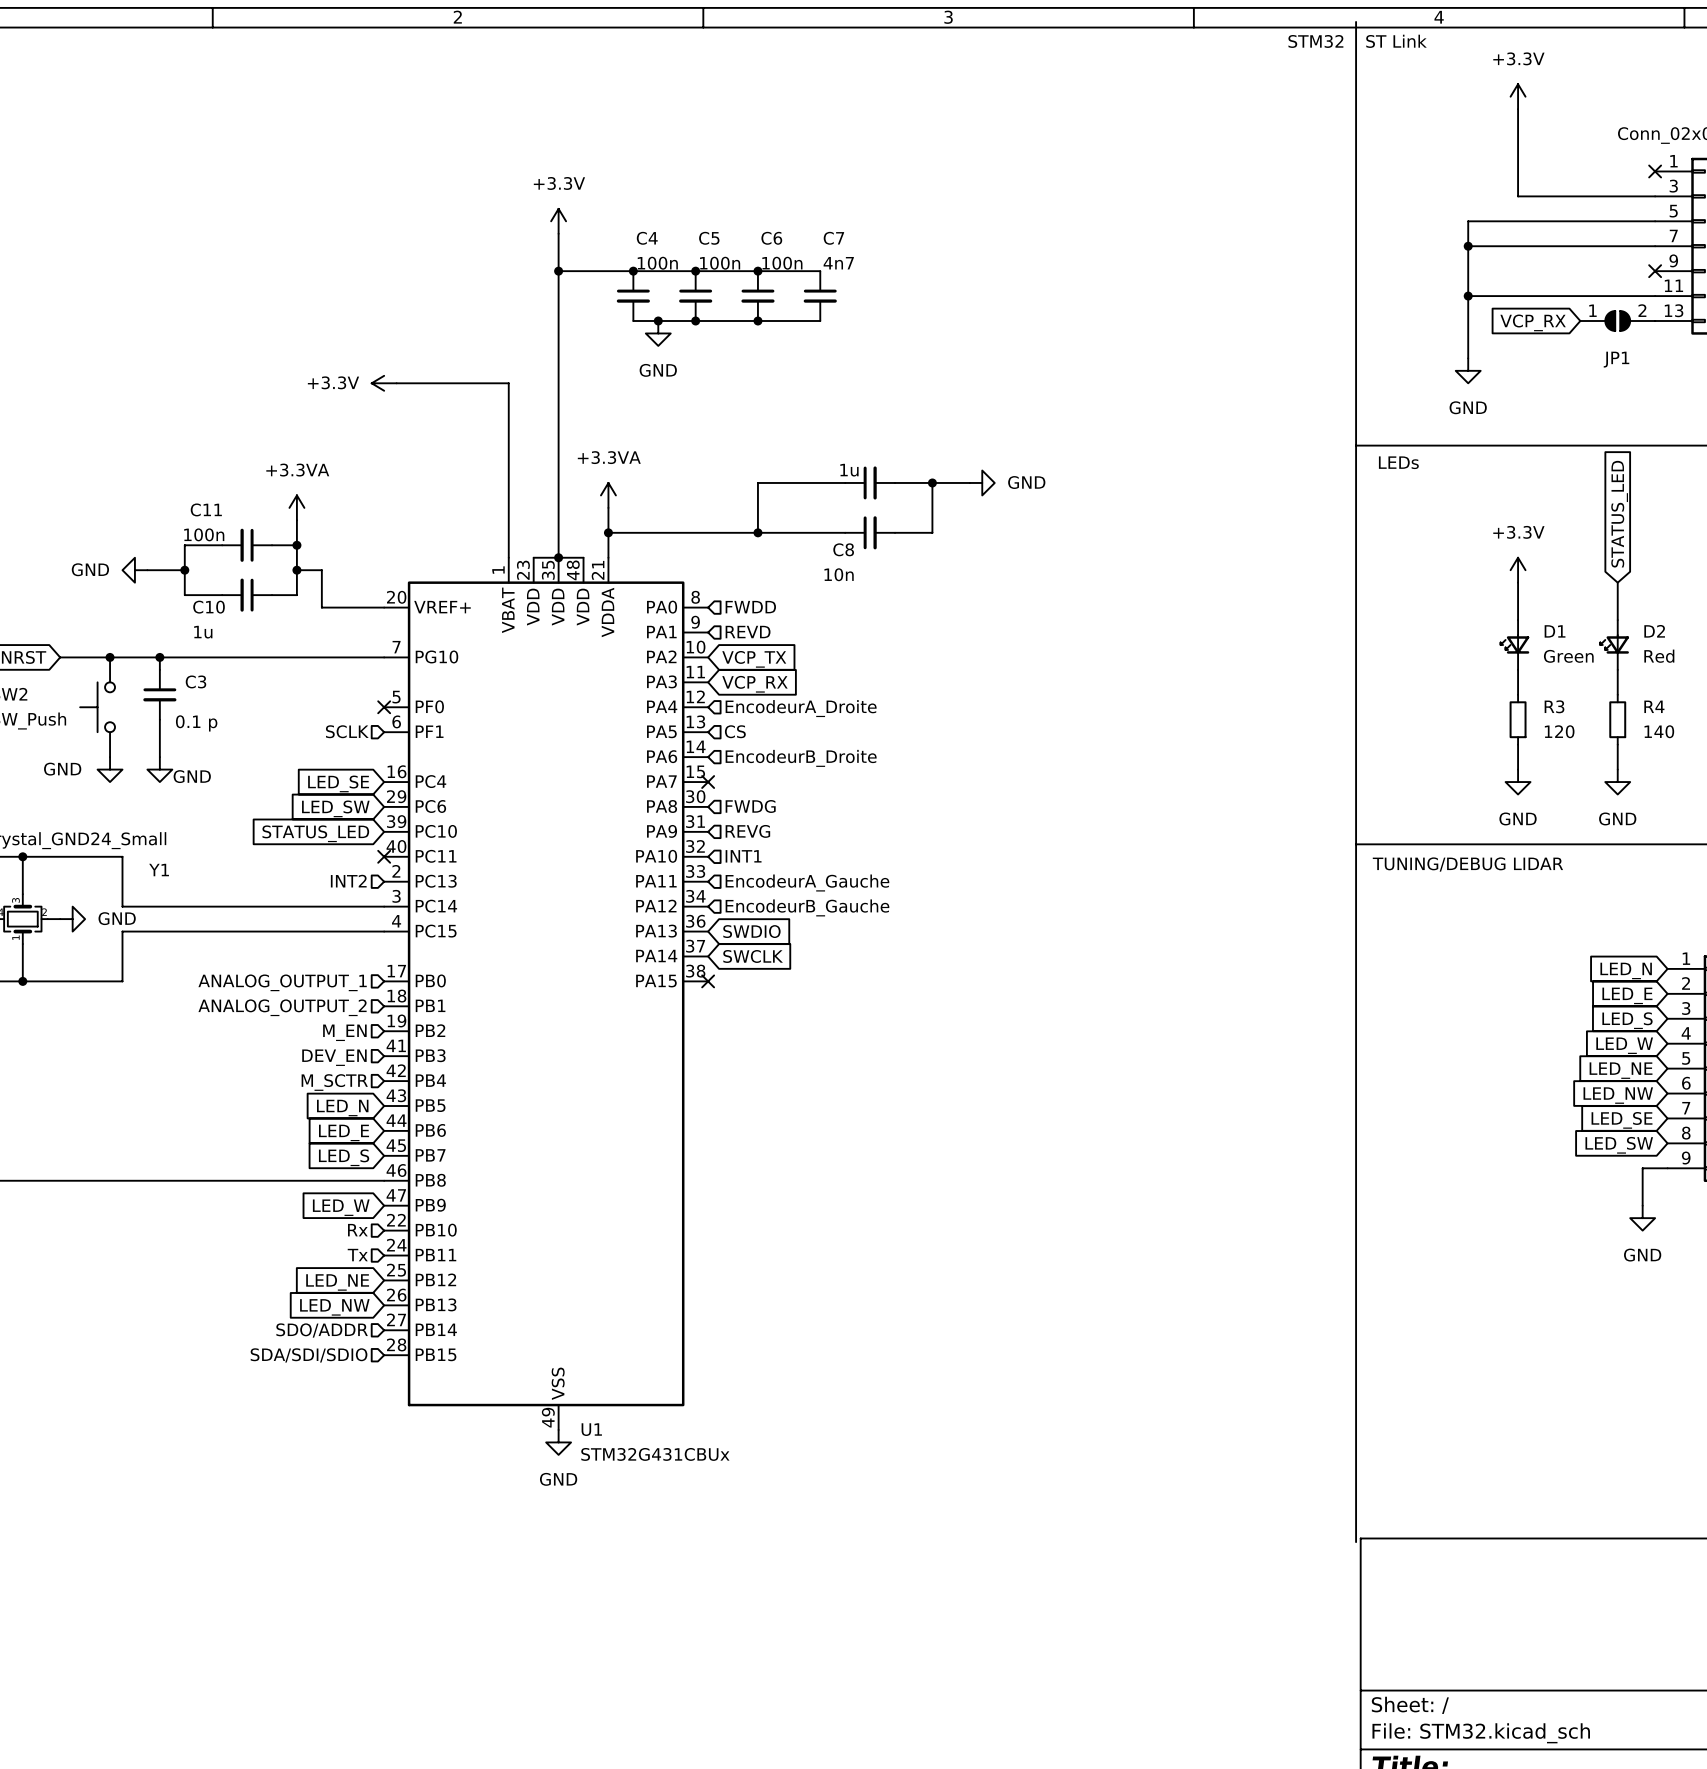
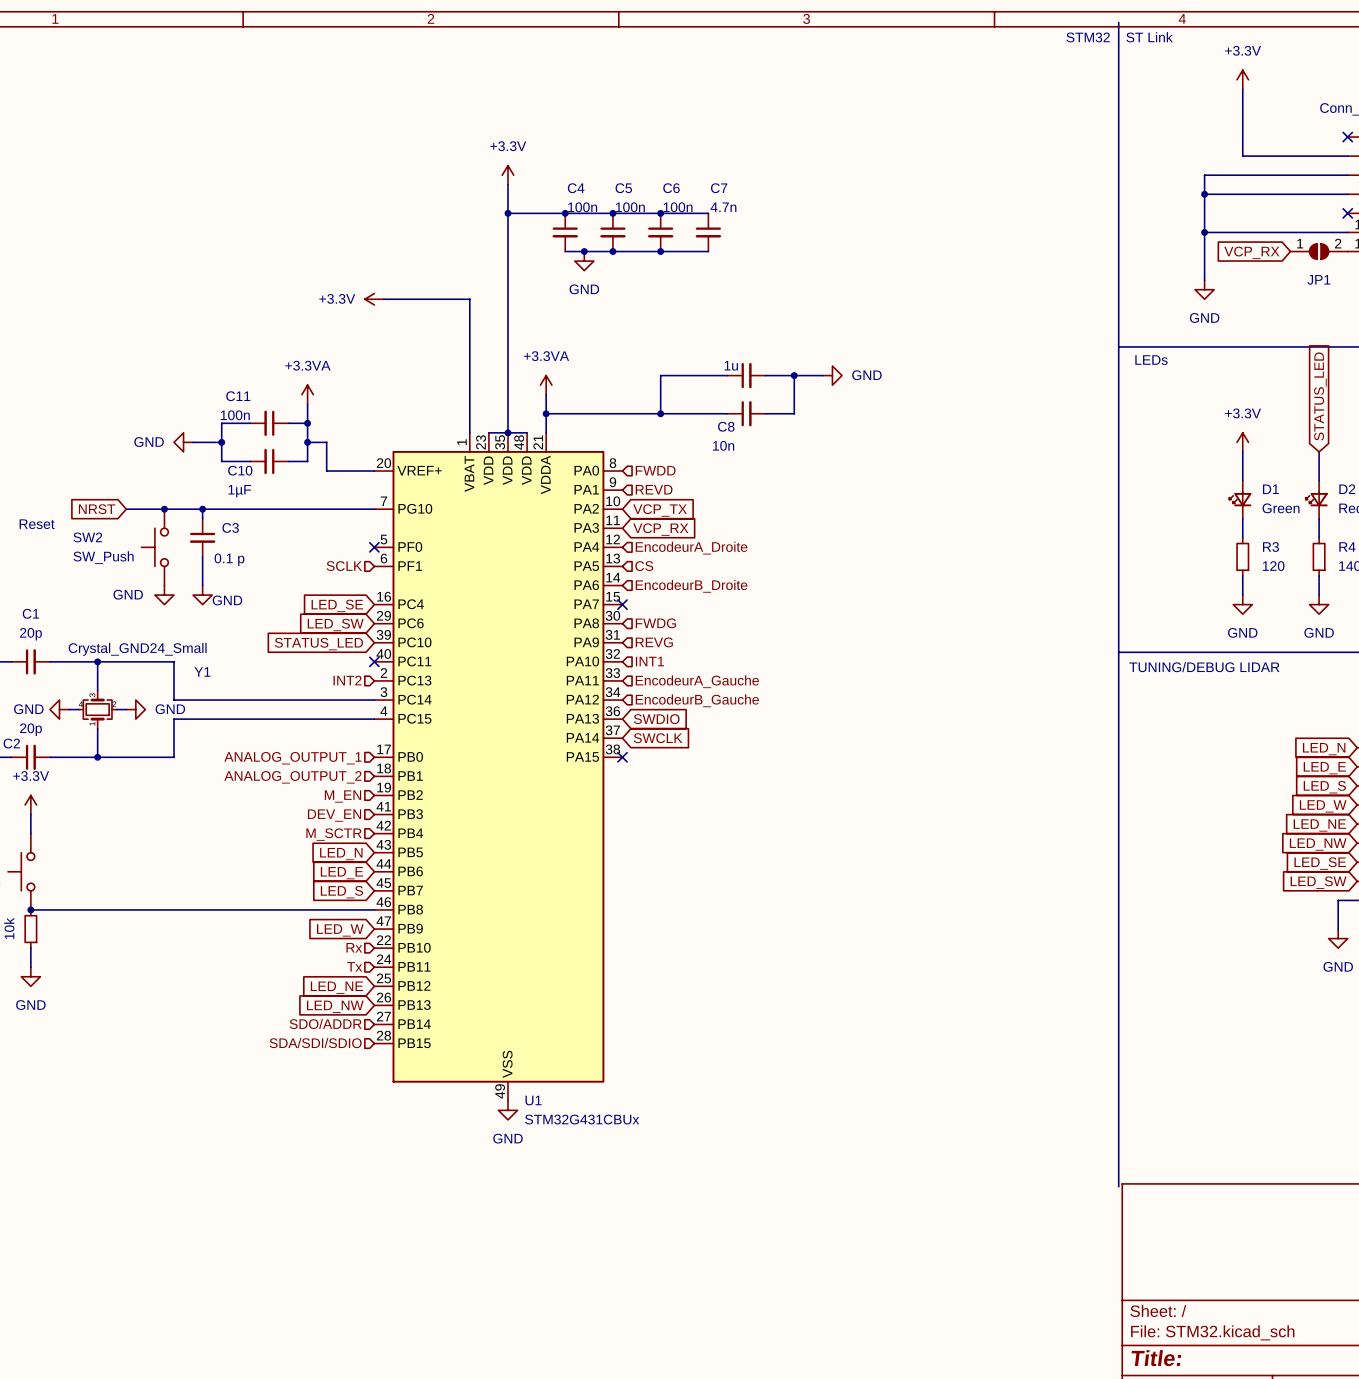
C7 value: 4n7 (838, 263) -> 4.7n (723, 207)
C10 value: 1u (203, 632) -> 1µF (239, 491)

